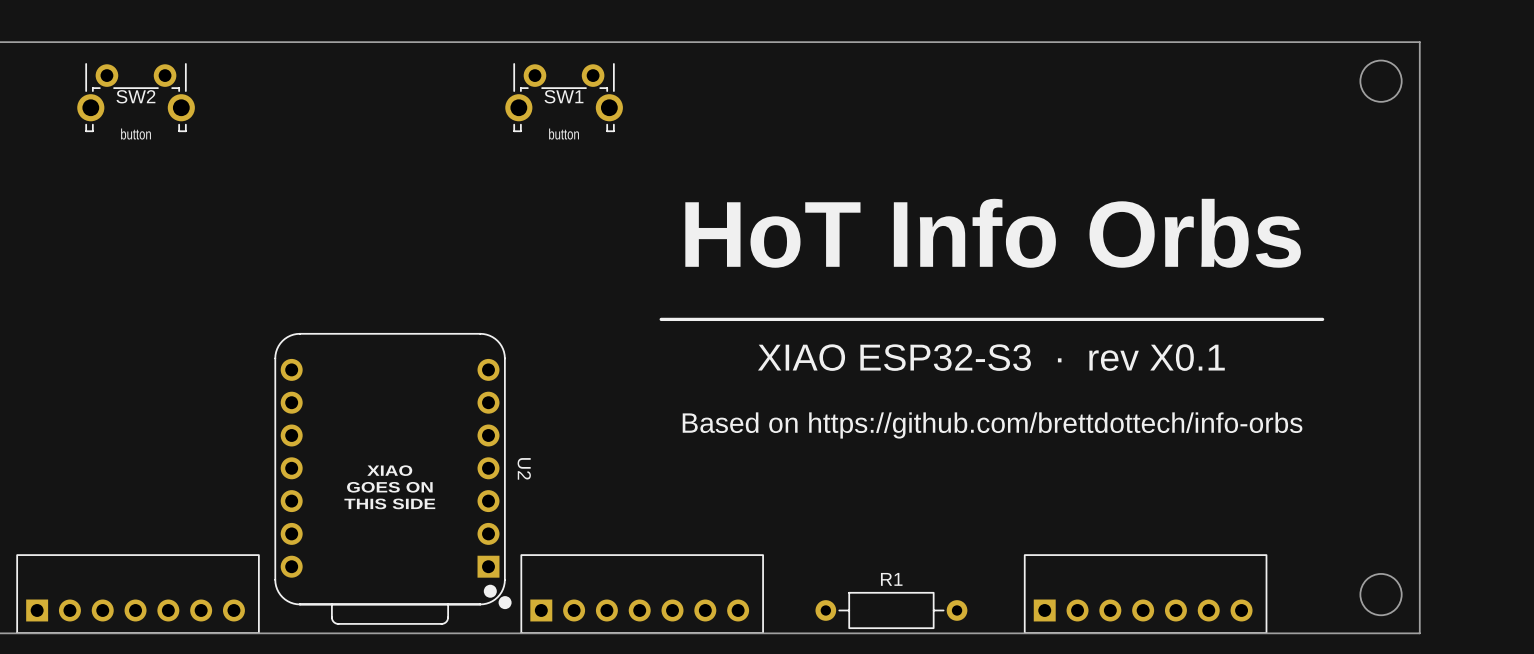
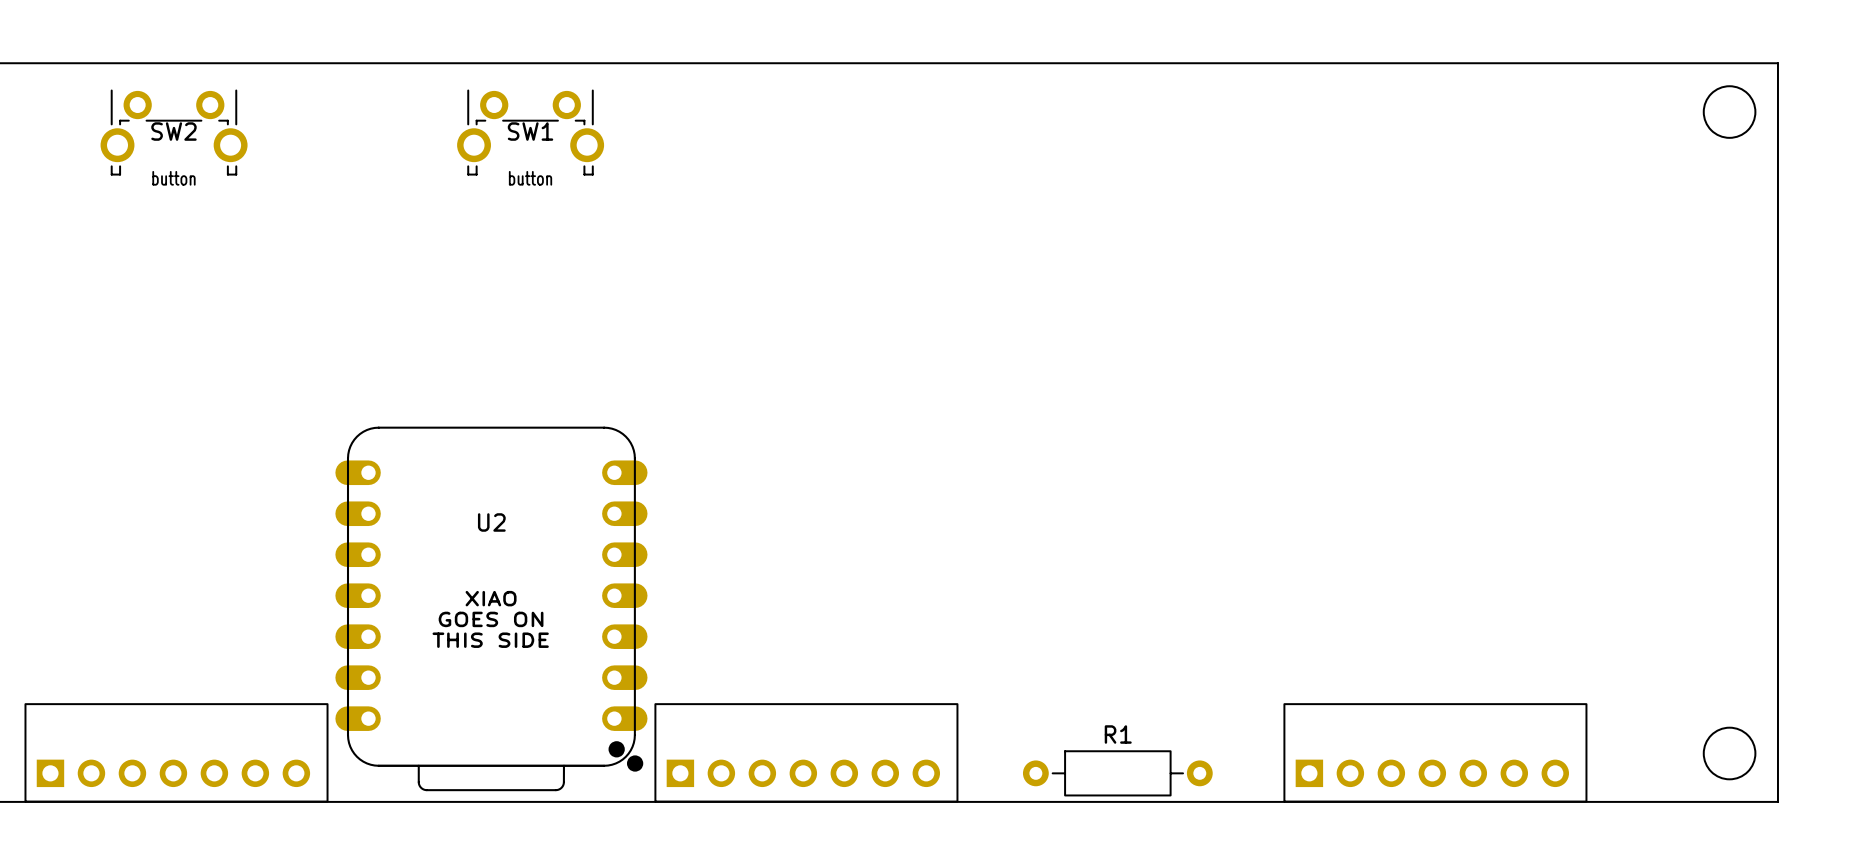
SW1 position: (564, 97) -> (530, 132)
text position: button (564, 134) -> button (530, 178)
text: HoT Info Orbs (993, 233) -> none
line: (1322, 319) (661, 319) -> none
U2 footprint: [274, 332, 512, 625] -> [335, 426, 648, 792]
text: XIAO ESP32-S3 · rev X0.1 (991, 357) -> none
text: Based on https://github.com/brettdottech/info-orbs (992, 425) -> none
U2 name position: U2 (524, 468) -> U2 (491, 522)

